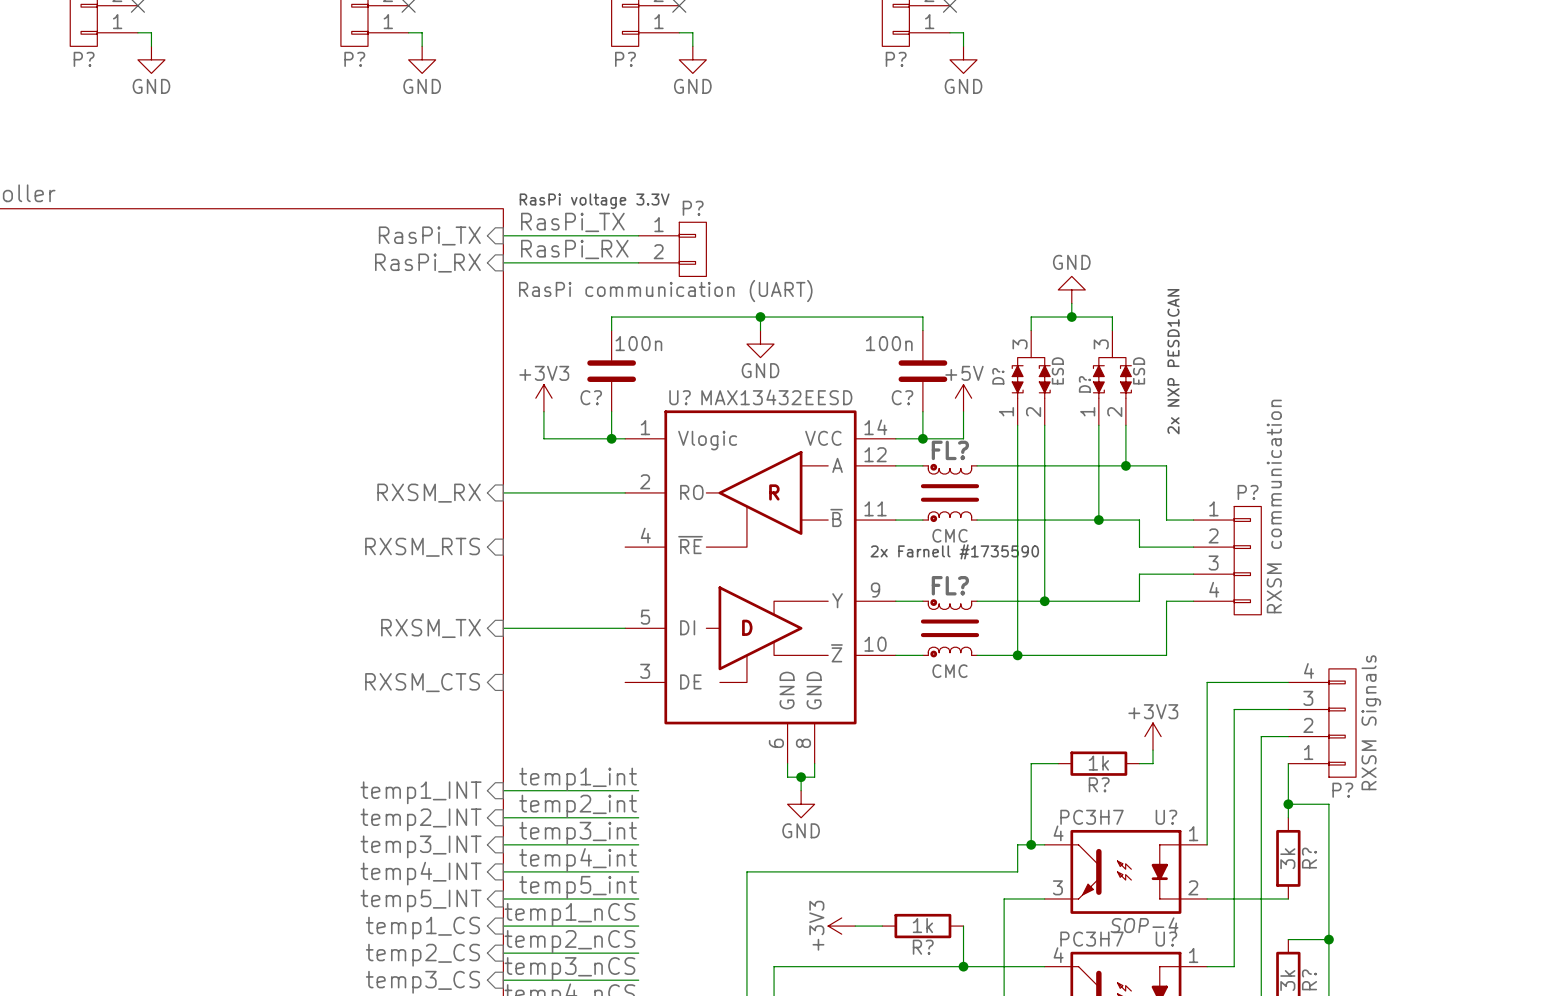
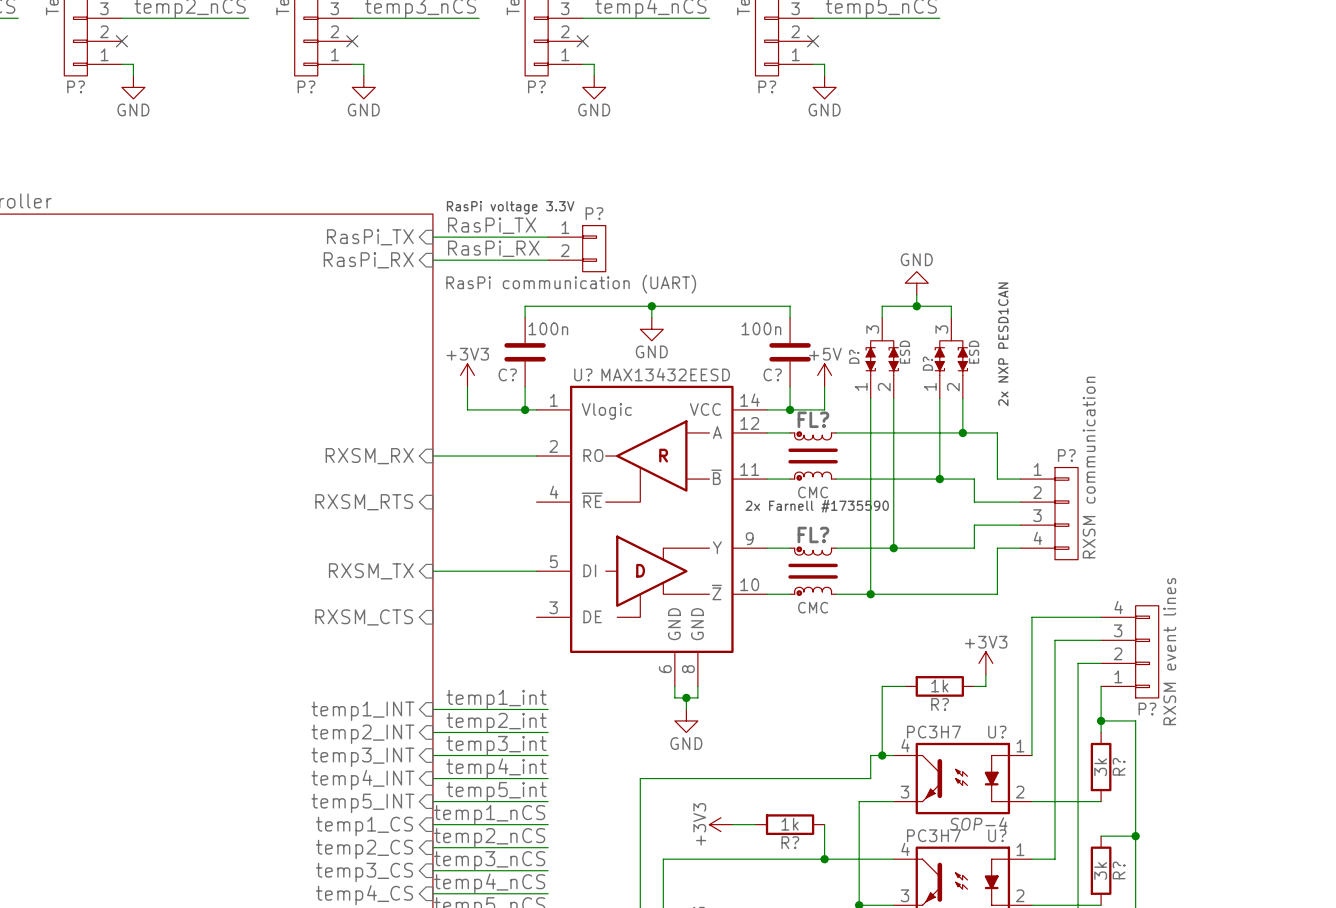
P? value: RXSM Signals (1371, 722) -> RXSM event lines (1169, 651)

